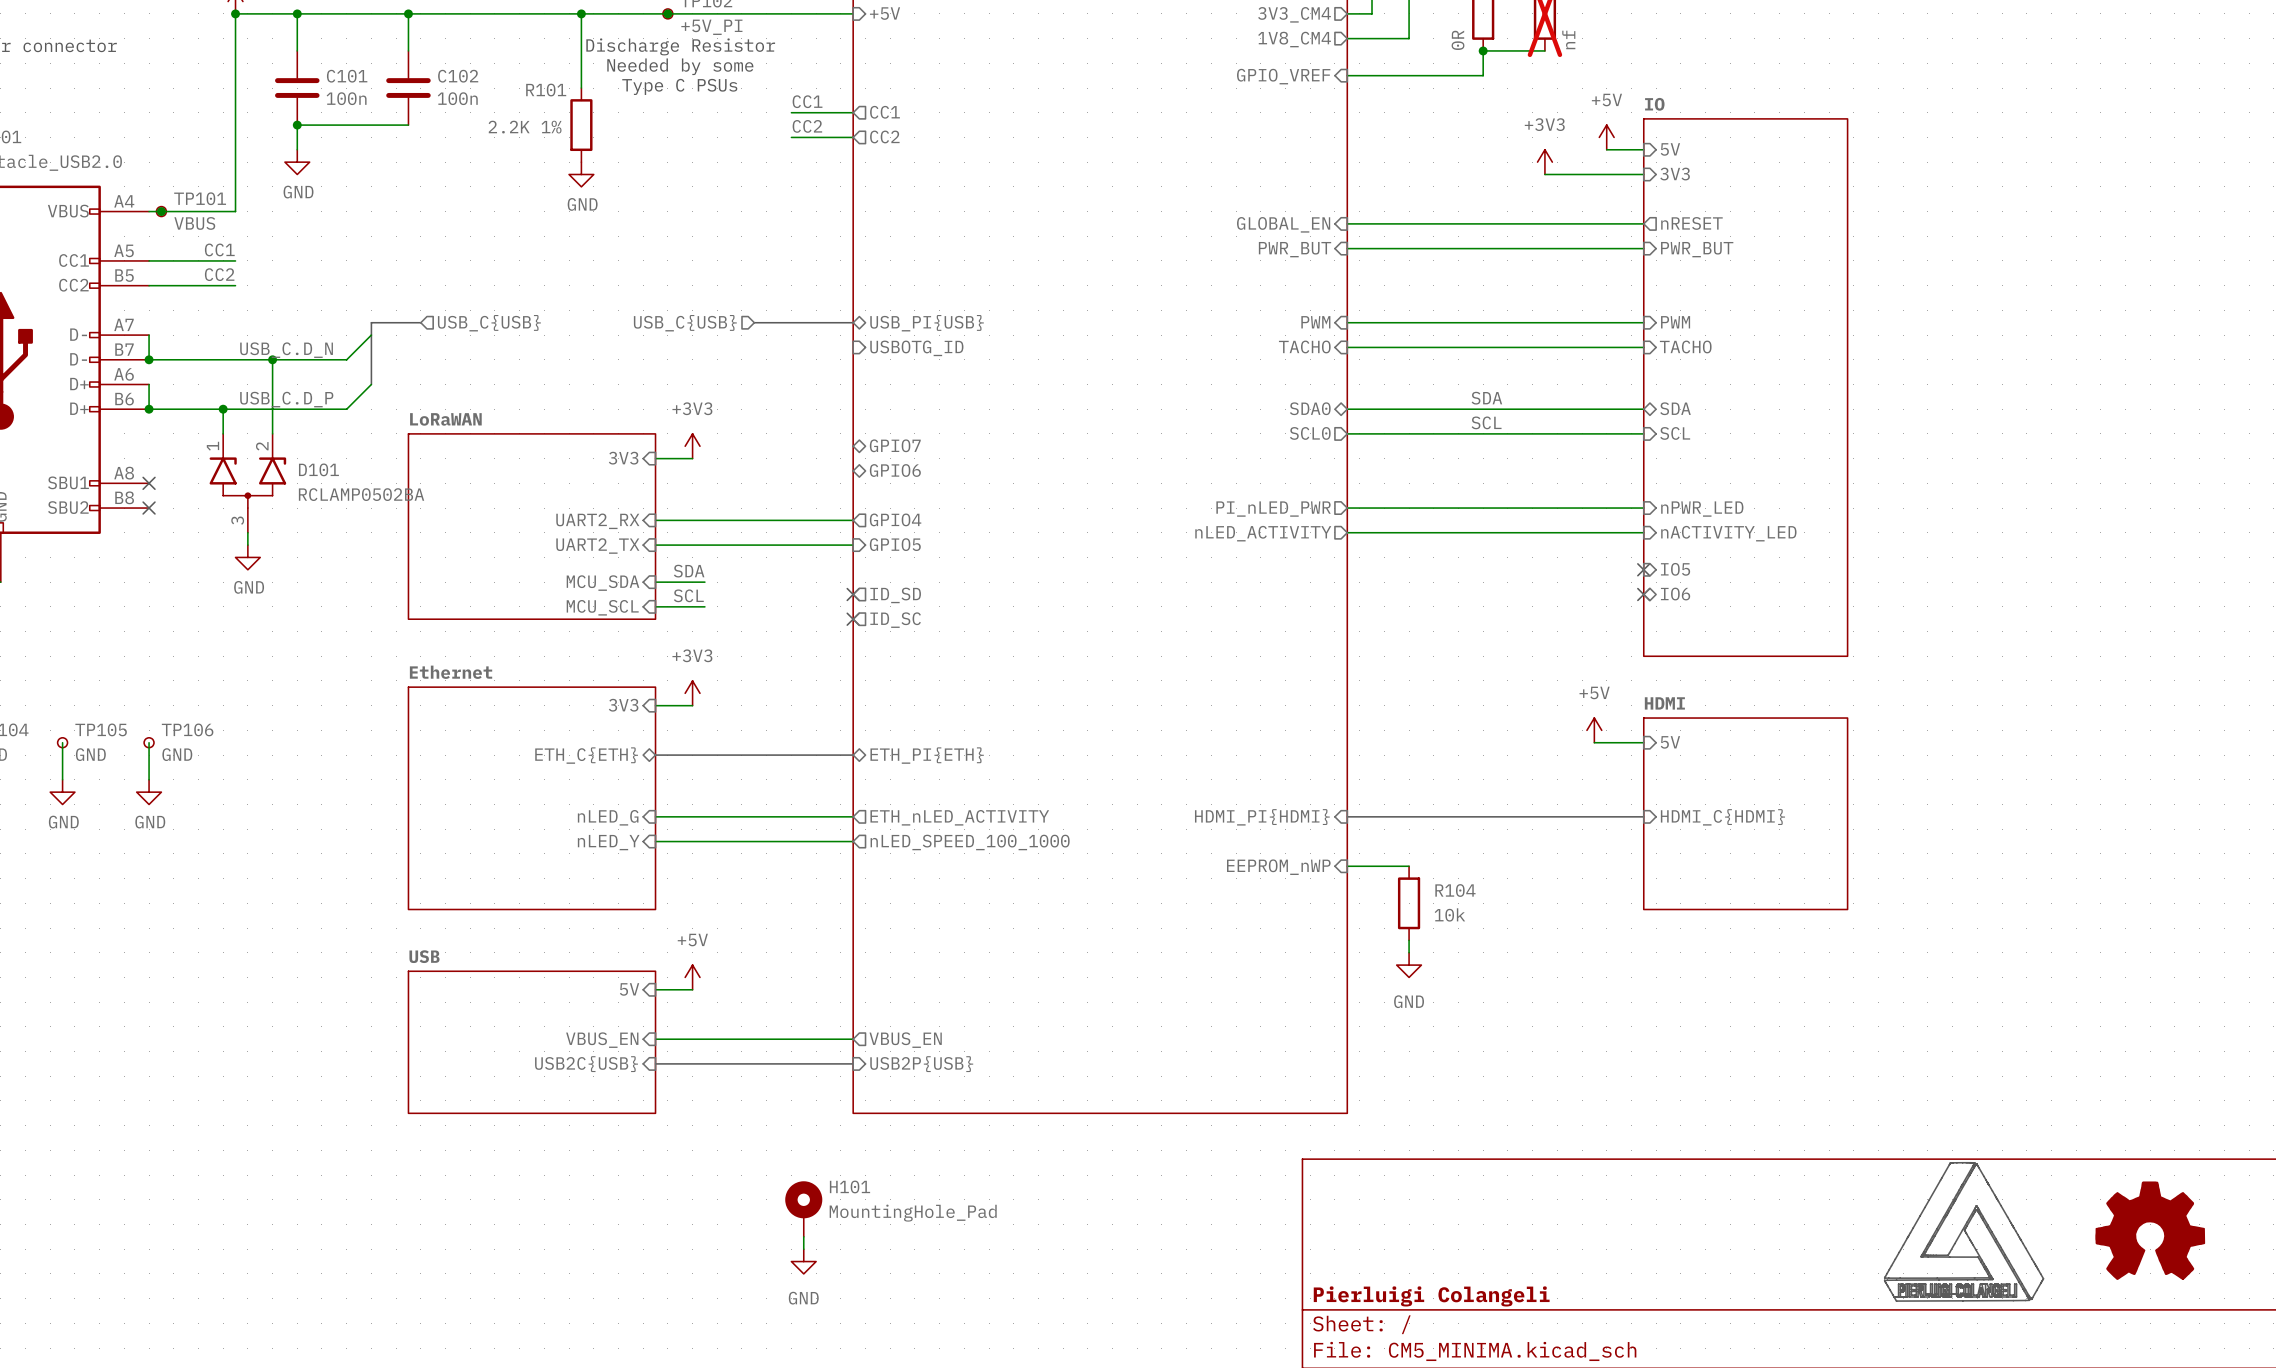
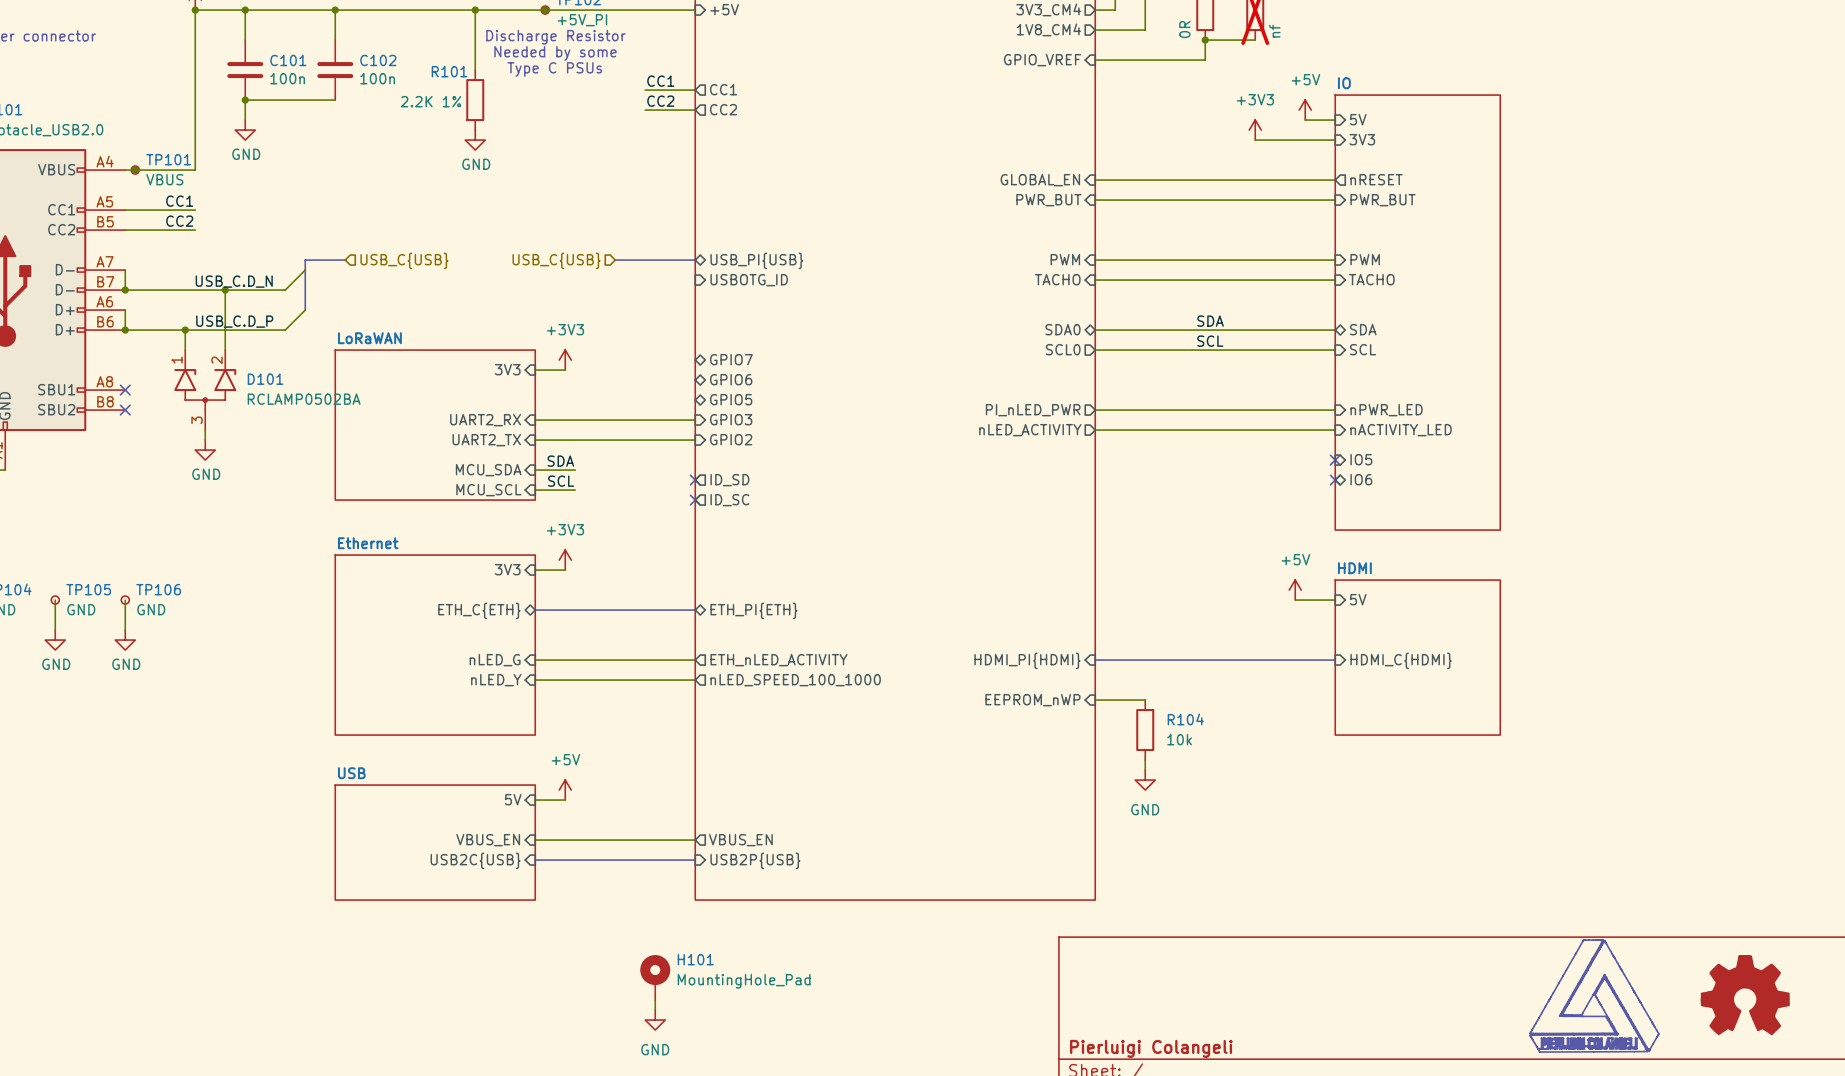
sheet pin: none -> GPIO5 (731, 399)
sheet pin shape: output (895, 519) -> input (731, 419)
sheet pin: GPIO4 (895, 519) -> GPIO3 (731, 419)
sheet pin: GPIO5 (895, 544) -> GPIO2 (731, 439)

